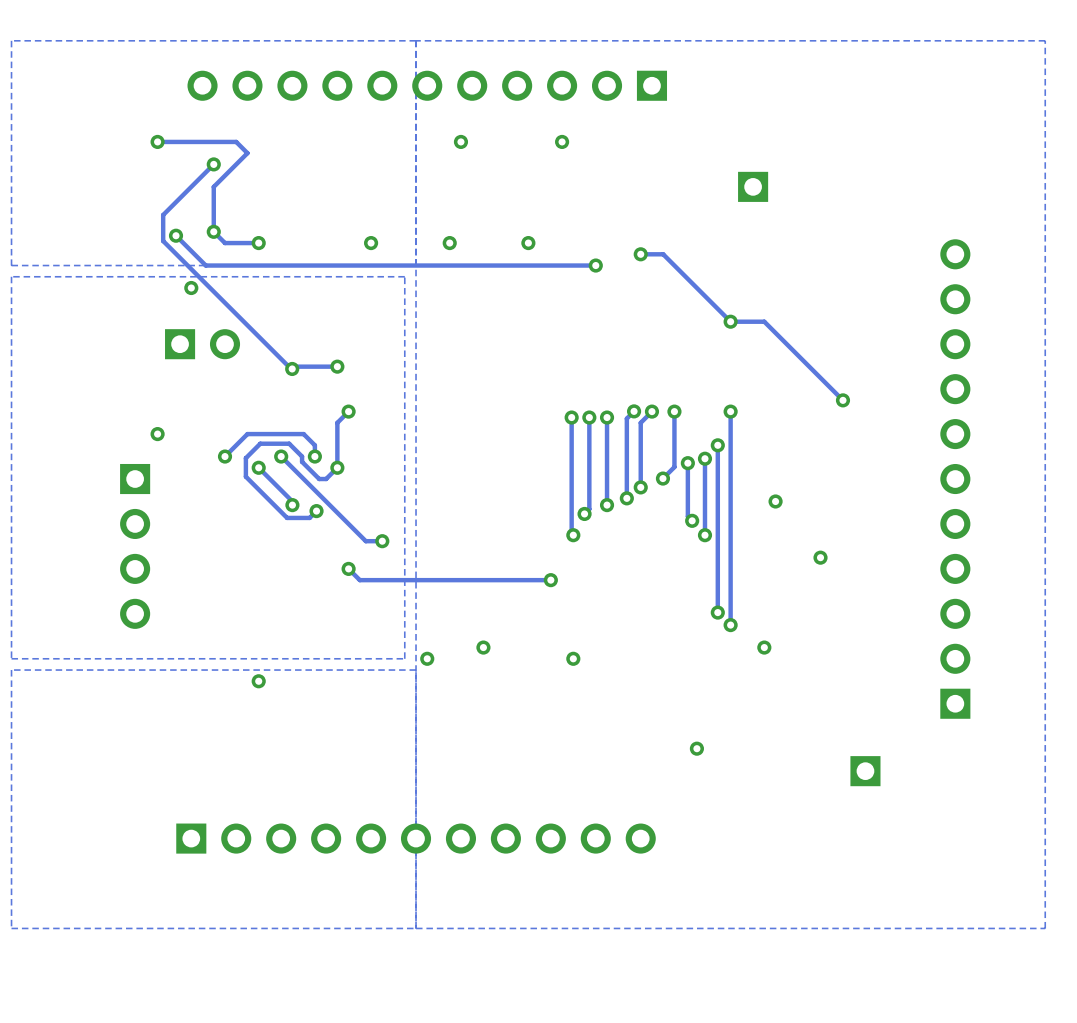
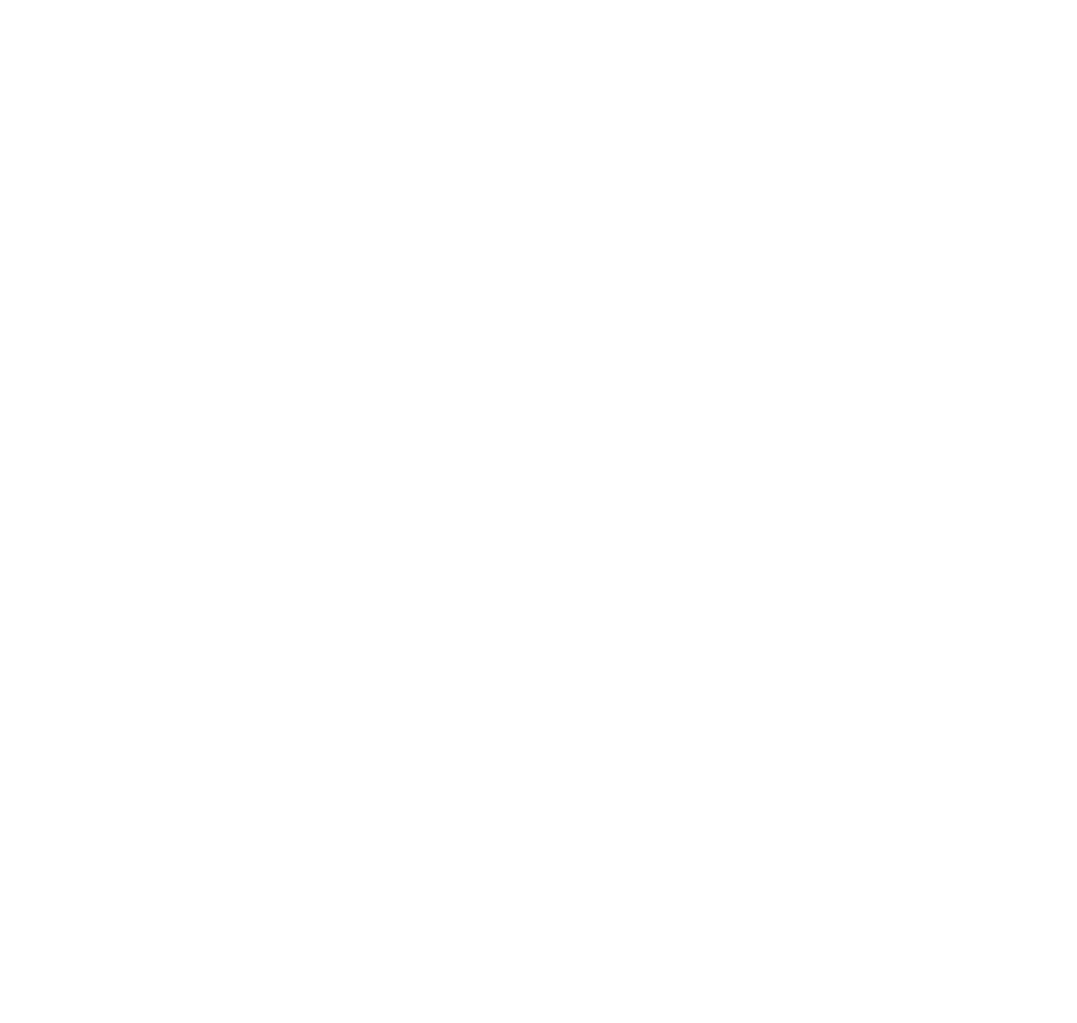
zone outline: (416, 40) (416, 928) -> none
part: (427, 85) -> none
track: (157, 141) (236, 141) (247, 153) (213, 186) (213, 231) (225, 243) (258, 243) -> none
via: (157, 141) -> none
via: (460, 141) -> none
via: (562, 141) -> none
track: (213, 164) (163, 215) (163, 241) (291, 368) -> none
via: (213, 164) -> none
part: (753, 186) -> none
via: (213, 231) -> none
track: (176, 235) (205, 265) (595, 265) -> none
via: (176, 235) -> none
via: (258, 243) -> none
via: (371, 243) -> none
via: (449, 243) -> none
via: (528, 243) -> none
track: (640, 254) (663, 254) (730, 321) (764, 321) (842, 400) -> none
via: (640, 254) -> none
zone outline: (416, 265) (11, 265) (11, 40) (1045, 40) (1045, 928) (11, 928) (11, 670) (416, 670) -> none
via: (595, 265) -> none
zone outline: (404, 276) (404, 658) (11, 658) (11, 276) (404, 276) -> none
via: (191, 288) -> none
via: (730, 321) -> none
part: (202, 344) -> none
track: (337, 366) (294, 366) (292, 368) -> none
via: (337, 366) -> none
via: (292, 368) -> none
via: (842, 400) -> none
track: (348, 411) (337, 422) (337, 467) (326, 479) (319, 479) (302, 461) (302, 456) (289, 443) (260, 443) (245, 458) (245, 476) (287, 517) (309, 517) (316, 511) -> none
via: (348, 411) -> none
track: (634, 411) (626, 418) (626, 498) -> none
via: (634, 411) -> none
track: (651, 411) (640, 422) (640, 487) -> none
via: (651, 411) -> none
track: (674, 411) (674, 467) (662, 478) -> none
via: (674, 411) -> none
track: (730, 411) (730, 625) -> none
via: (730, 411) -> none
track: (571, 417) (571, 533) (573, 535) -> none
via: (571, 417) -> none
track: (589, 417) (589, 509) (584, 513) -> none
via: (589, 417) -> none
track: (607, 417) (607, 505) -> none
via: (607, 417) -> none
via: (157, 434) -> none
track: (717, 445) (717, 612) -> none
via: (717, 445) -> none
via: (225, 456) -> none
track: (281, 456) (365, 541) (382, 541) -> none
via: (281, 456) -> none
track: (314, 456) (314, 445) (303, 434) (247, 434) (225, 456) -> none
via: (314, 456) -> none
track: (704, 458) (704, 535) -> none
via: (704, 458) -> none
track: (687, 463) (687, 516) (692, 520) -> none
via: (687, 463) -> none
track: (258, 467) (292, 501) (292, 505) -> none
via: (258, 467) -> none
via: (337, 467) -> none
via: (662, 478) -> none
part: (955, 479) -> none
via: (640, 487) -> none
via: (626, 498) -> none
via: (775, 501) -> none
via: (292, 505) -> none
via: (607, 505) -> none
via: (316, 511) -> none
via: (584, 513) -> none
via: (692, 520) -> none
via: (573, 535) -> none
via: (704, 535) -> none
via: (382, 541) -> none
part: (135, 546) -> none
via: (820, 557) -> none
track: (348, 568) (359, 580) (550, 580) -> none
via: (348, 568) -> none
via: (550, 580) -> none
via: (717, 612) -> none
via: (730, 625) -> none
via: (483, 647) -> none
via: (764, 647) -> none
via: (427, 658) -> none
via: (573, 658) -> none
via: (258, 681) -> none
via: (696, 748) -> none
part: (865, 771) -> none
part: (416, 838) -> none

